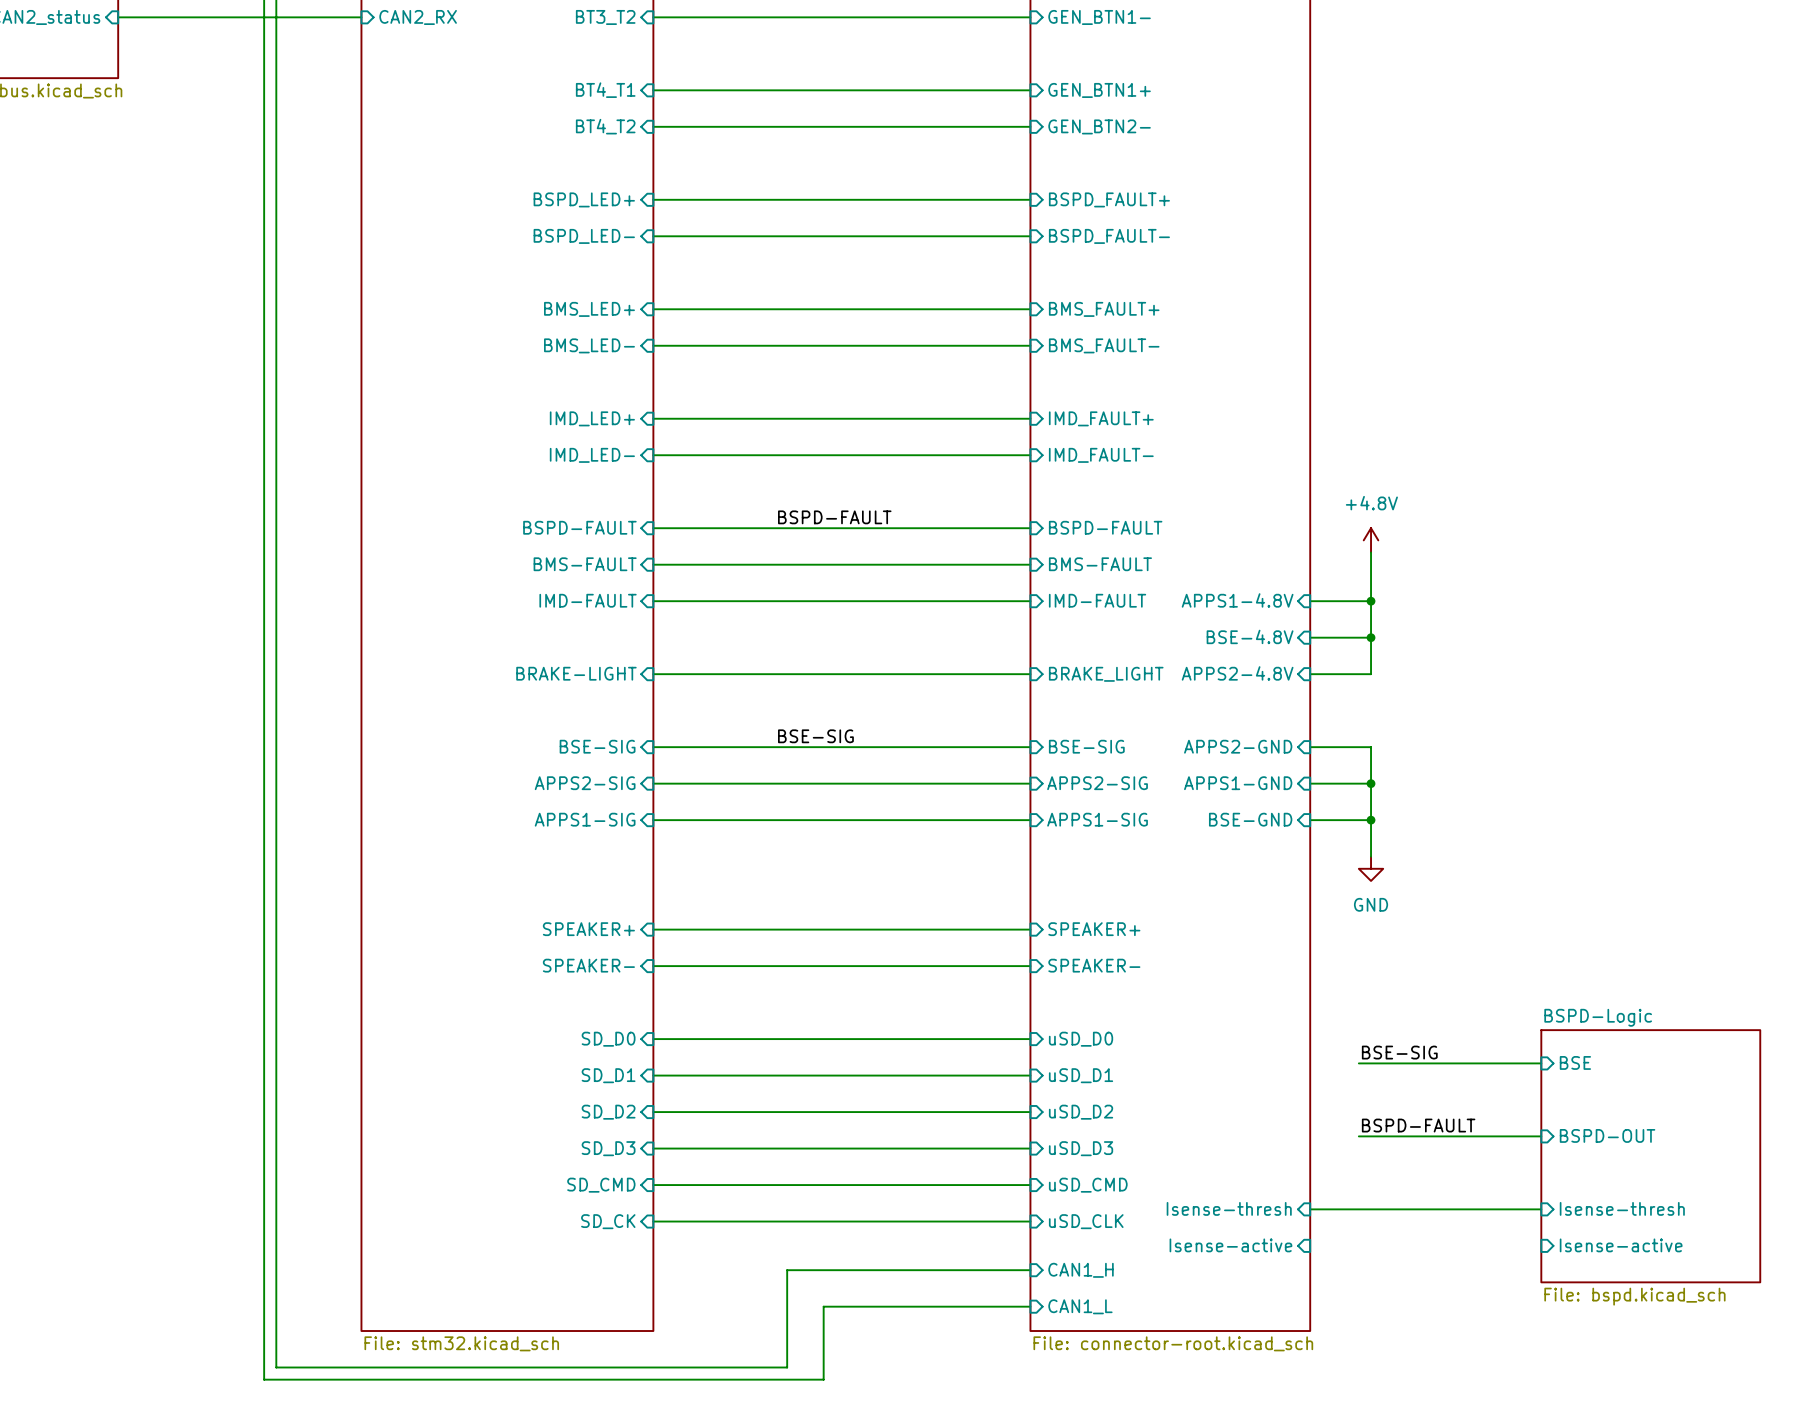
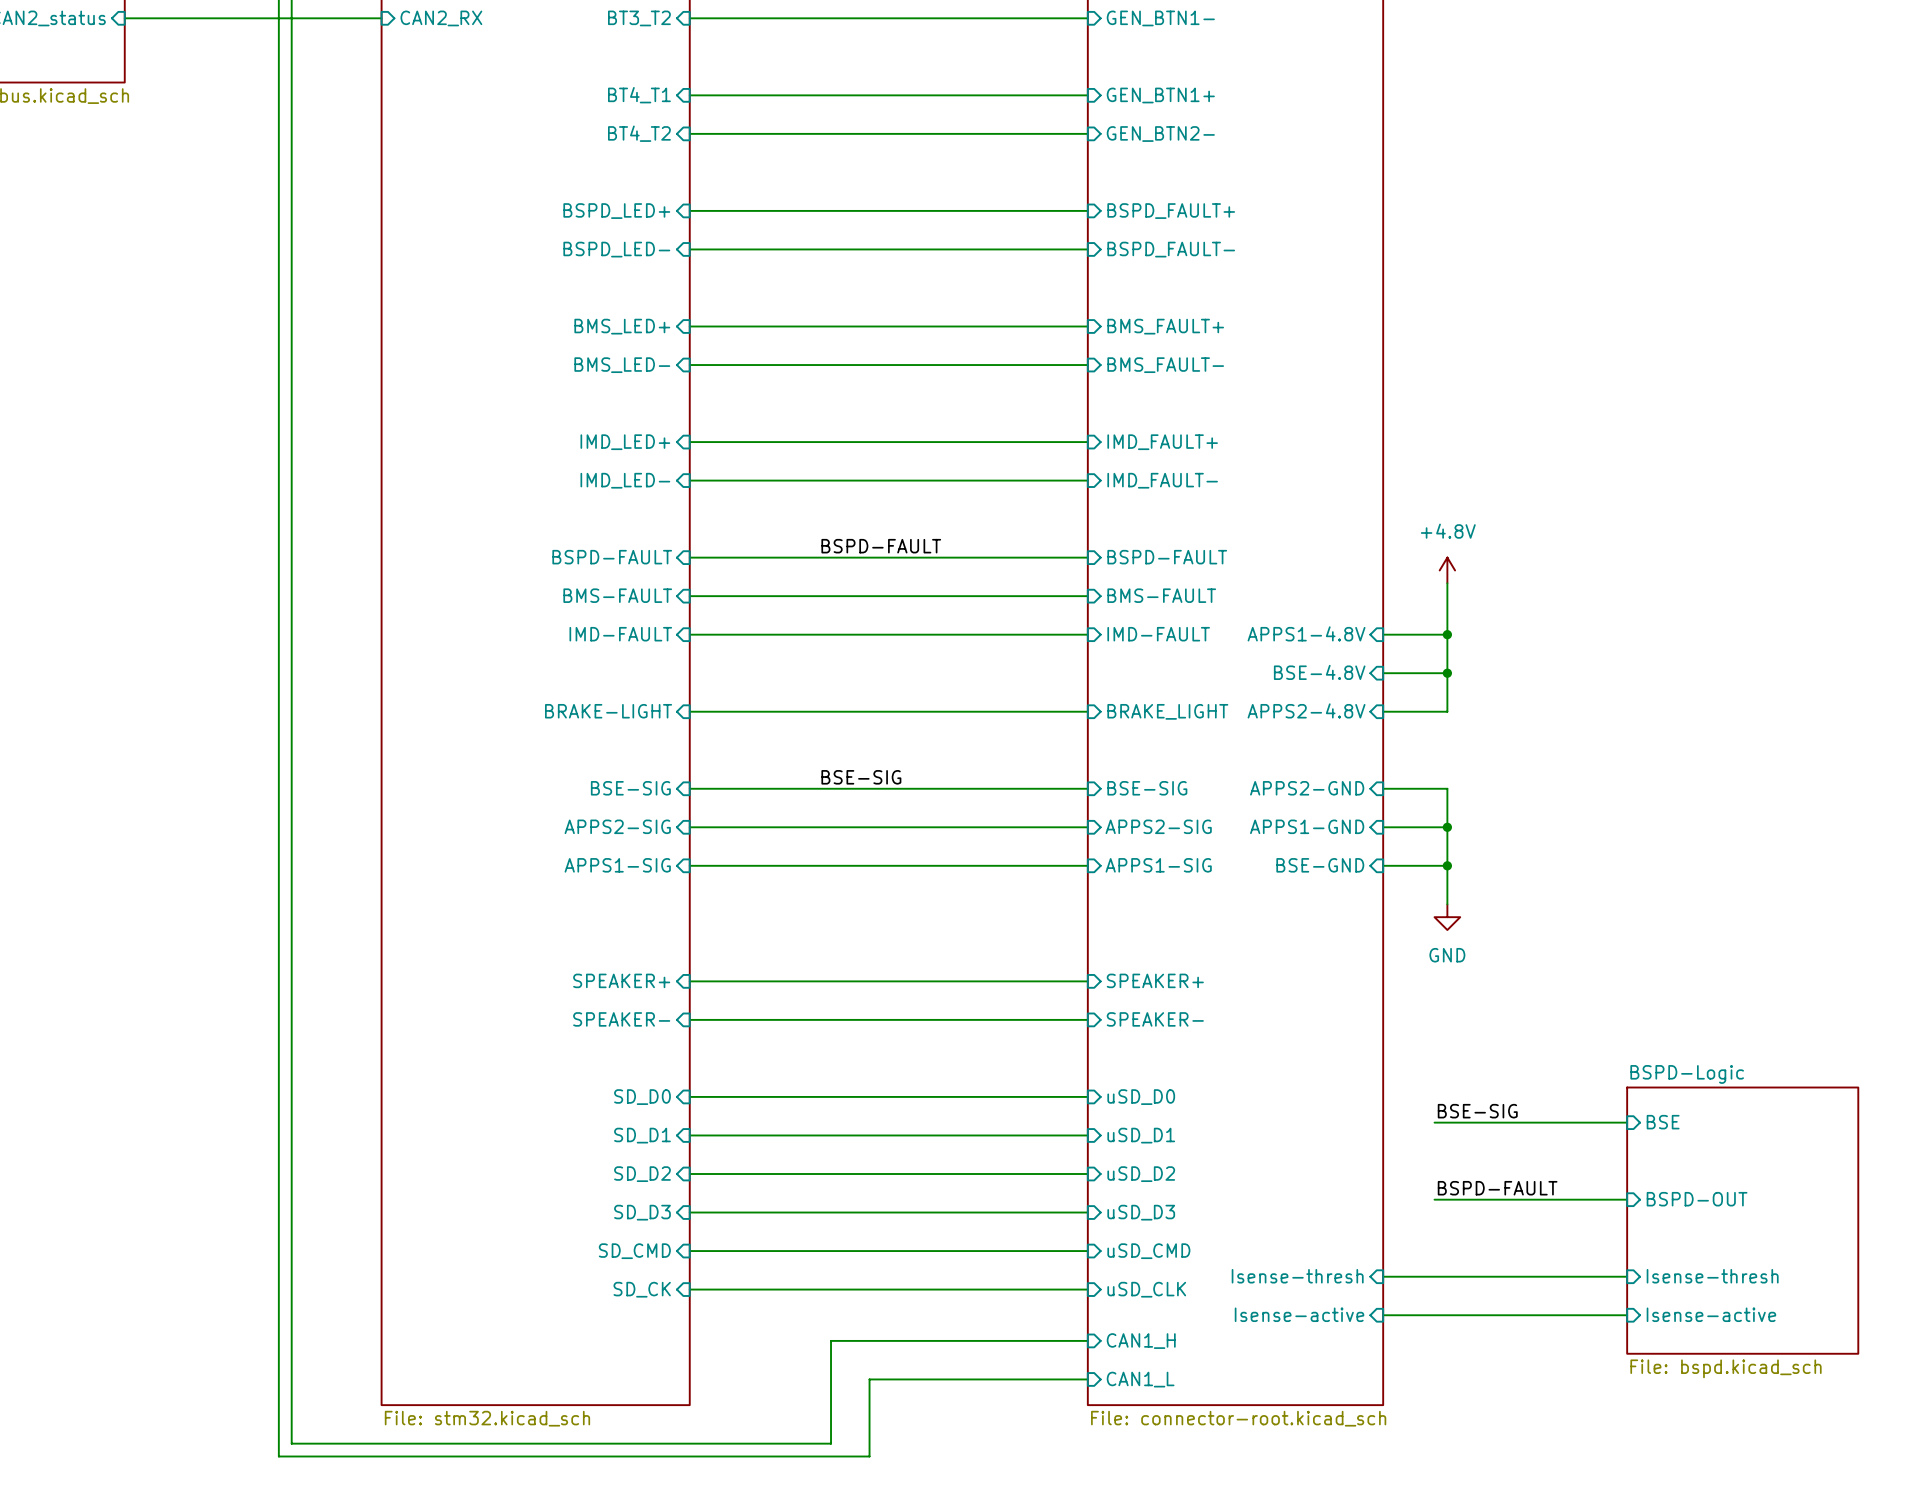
wire: none -> (1383, 1315) (1627, 1315)

